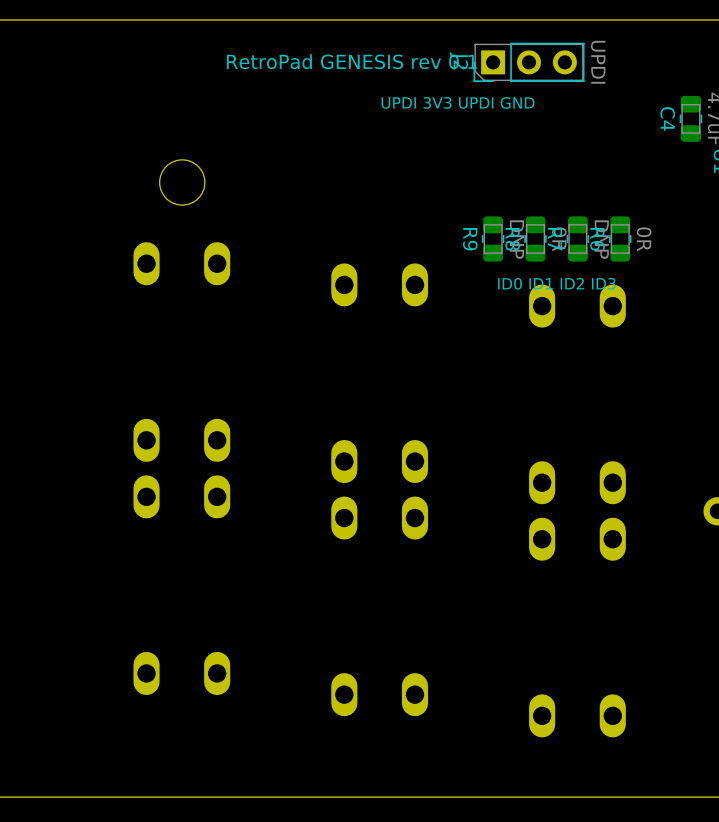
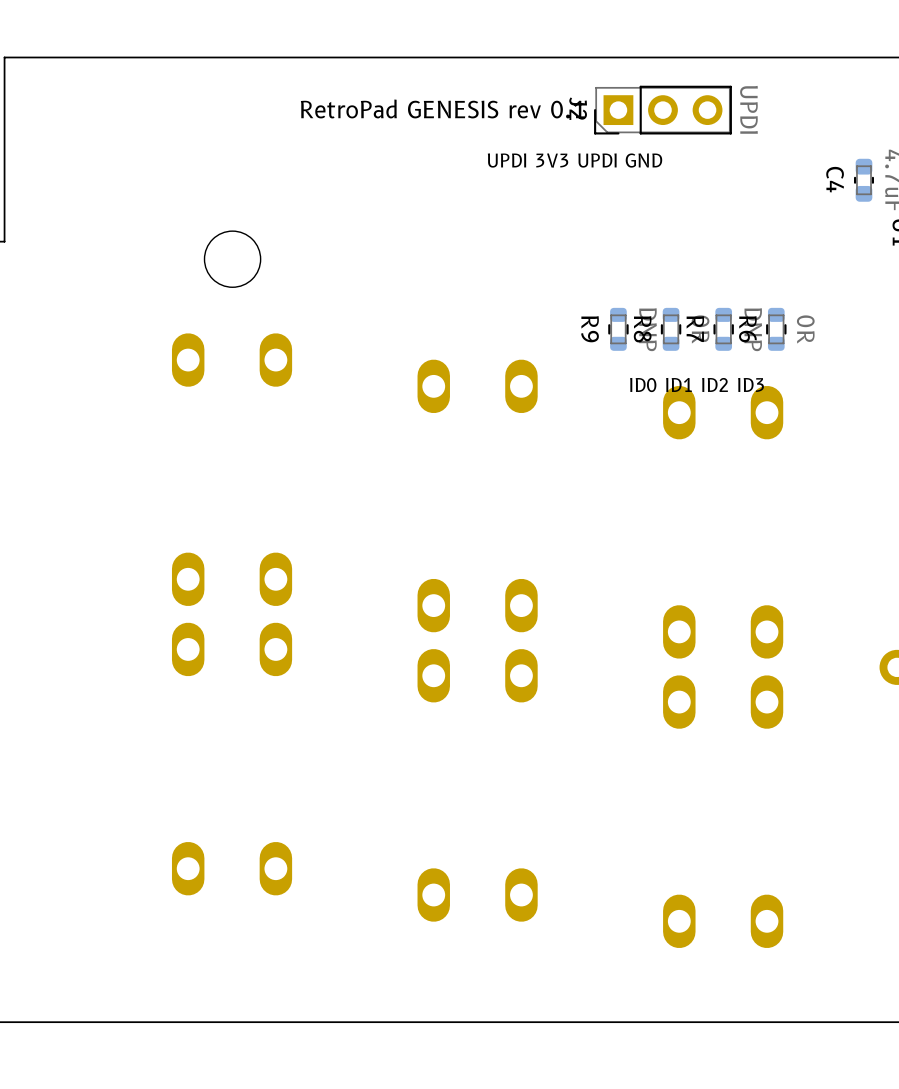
C4 footprint: [679, 95, 703, 142] -> [854, 158, 874, 202]
R9 footprint: [481, 216, 505, 262] -> [608, 307, 629, 351]
R8 footprint: [524, 216, 547, 262] -> [660, 307, 682, 351]
R7 footprint: [566, 216, 590, 262] -> [713, 307, 734, 351]
R6 footprint: [609, 216, 632, 262] -> [766, 307, 787, 351]

